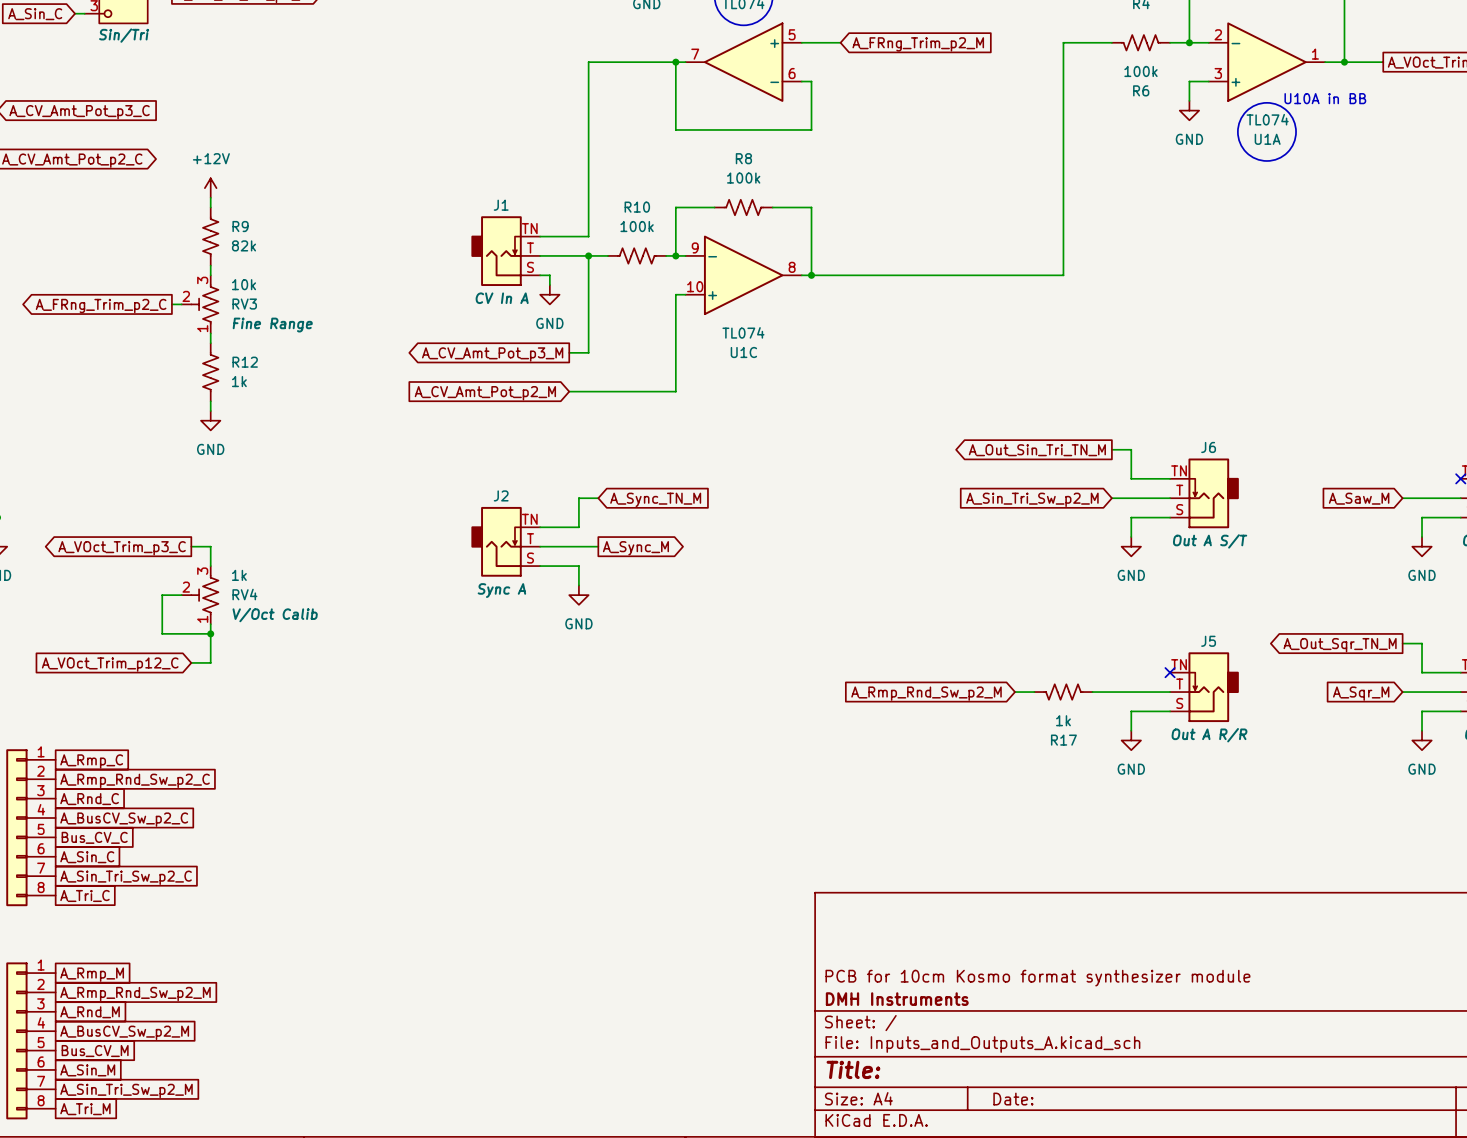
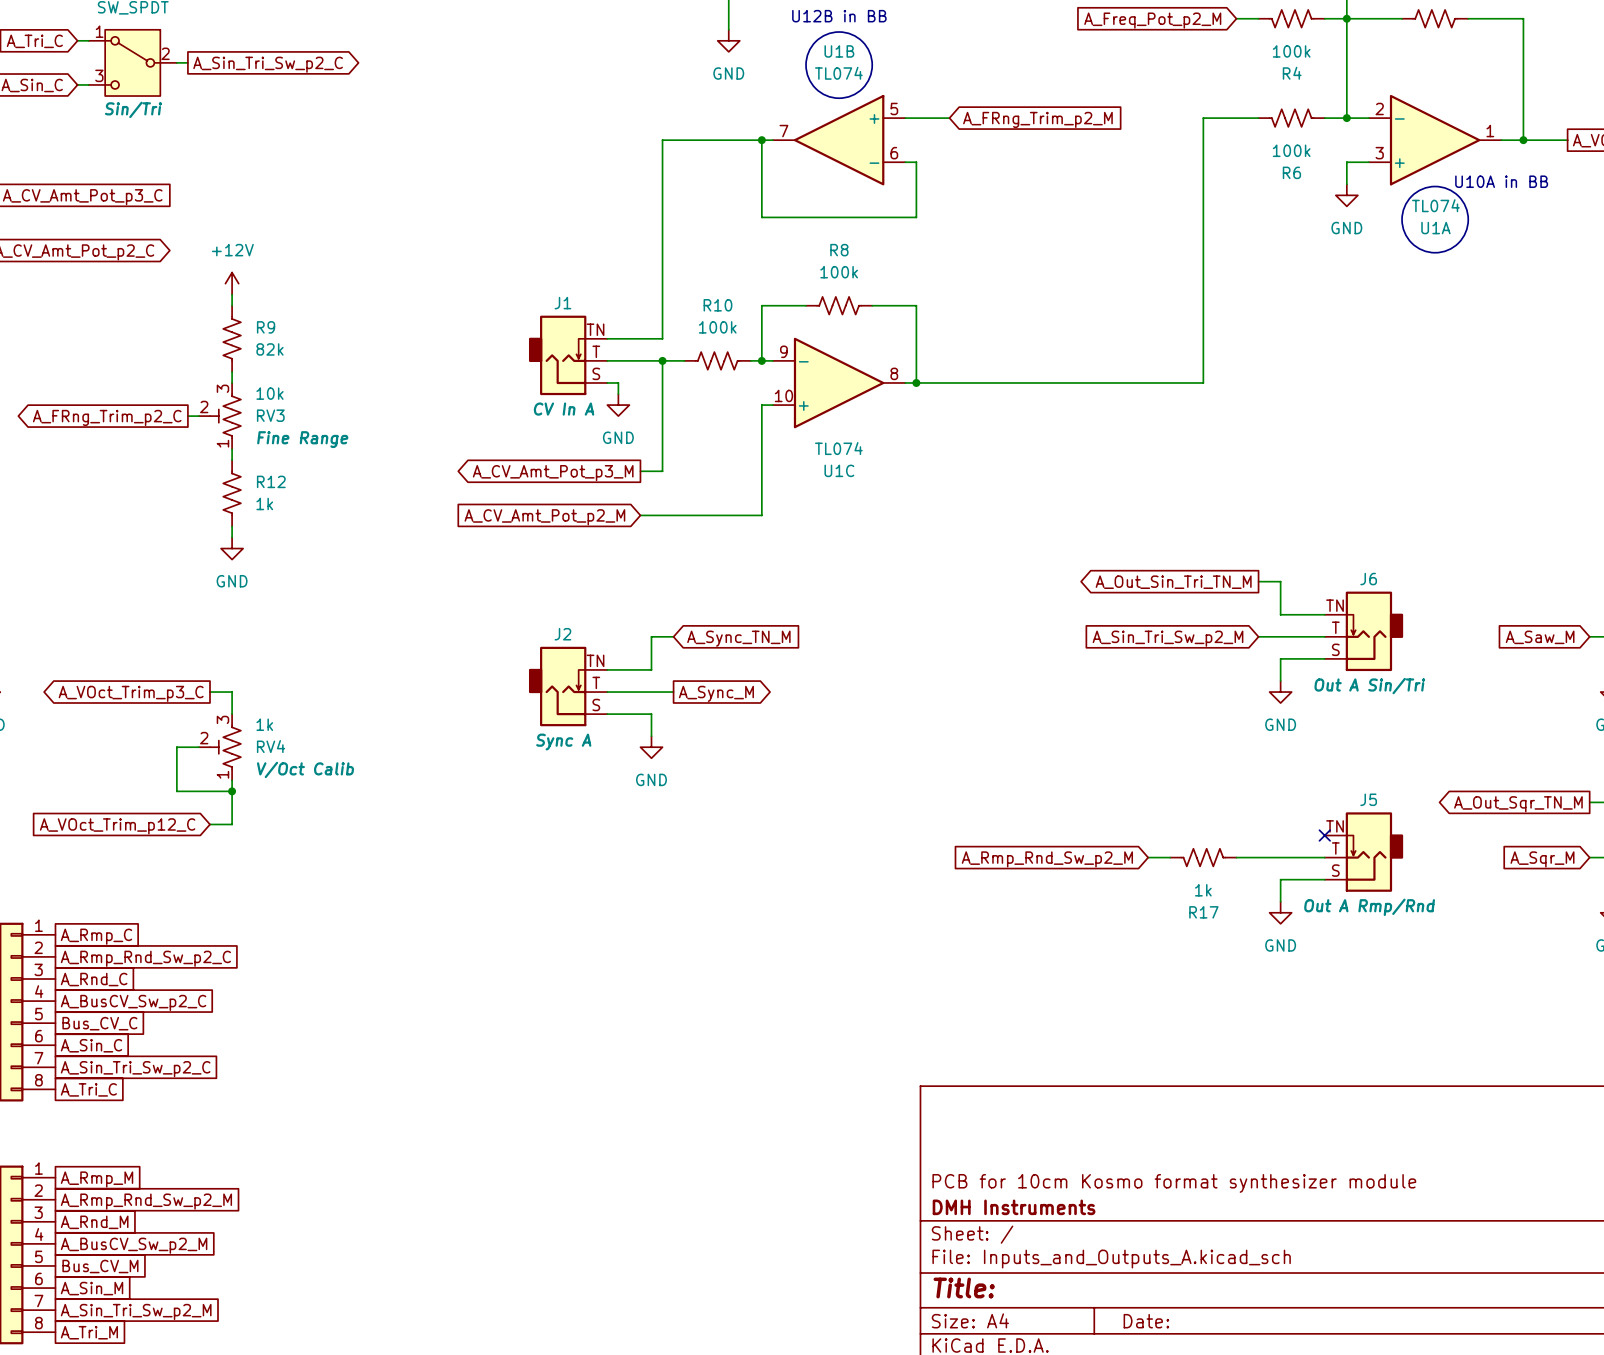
J6 text: Out A S/T (1210, 541) -> Out A Sin/Tri (1369, 686)
J5 text: Out A R/R (1209, 735) -> Out A Rmp/Rnd (1369, 907)

